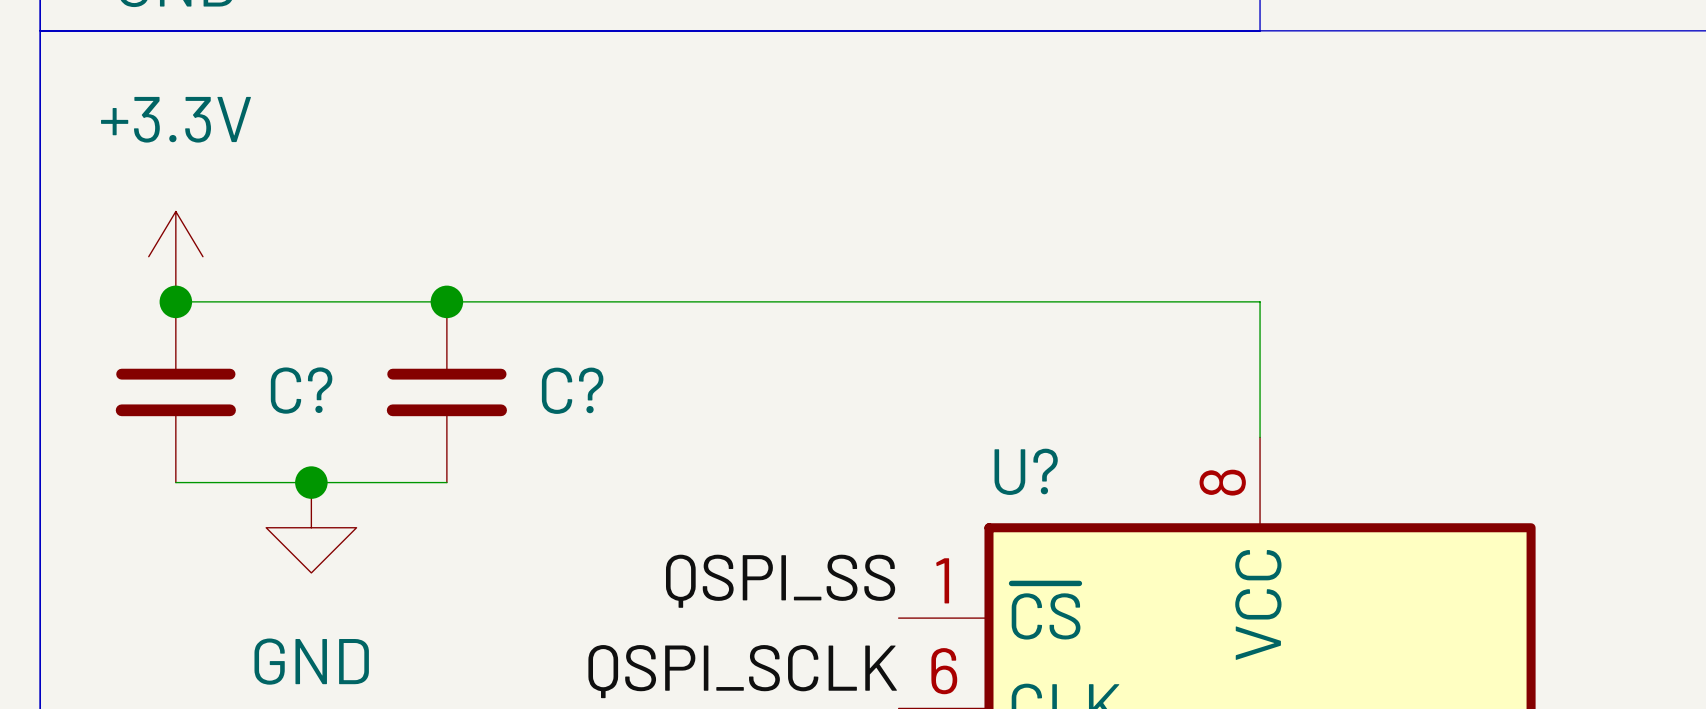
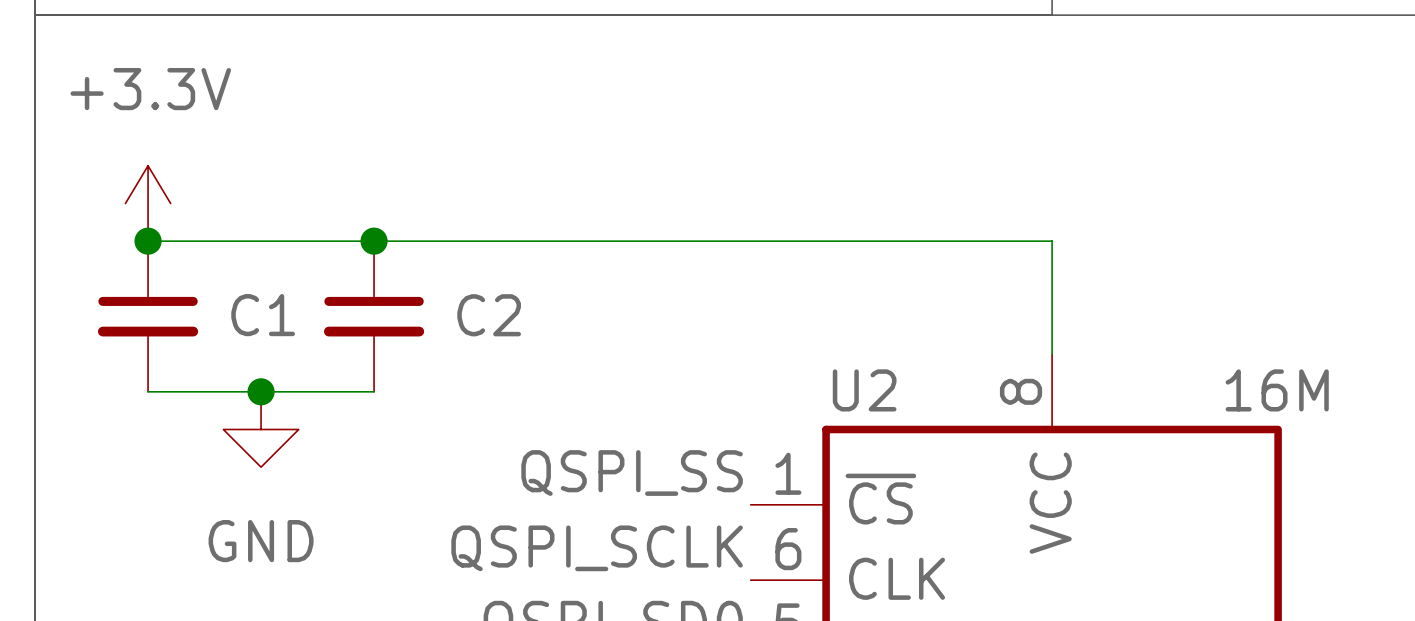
C? name: C? (301, 390) -> C1 (263, 315)
C? name: C? (572, 390) -> C2 (489, 315)
U? name: U? (1026, 471) -> U2 (864, 390)
U? value: none -> 16M (1277, 390)

